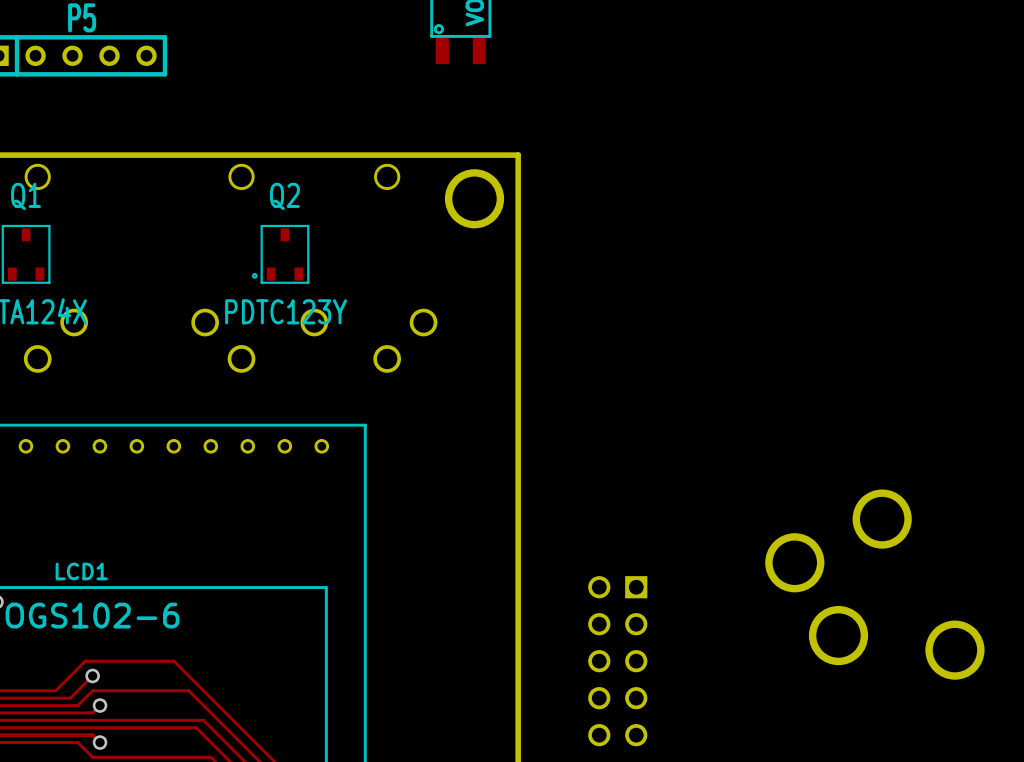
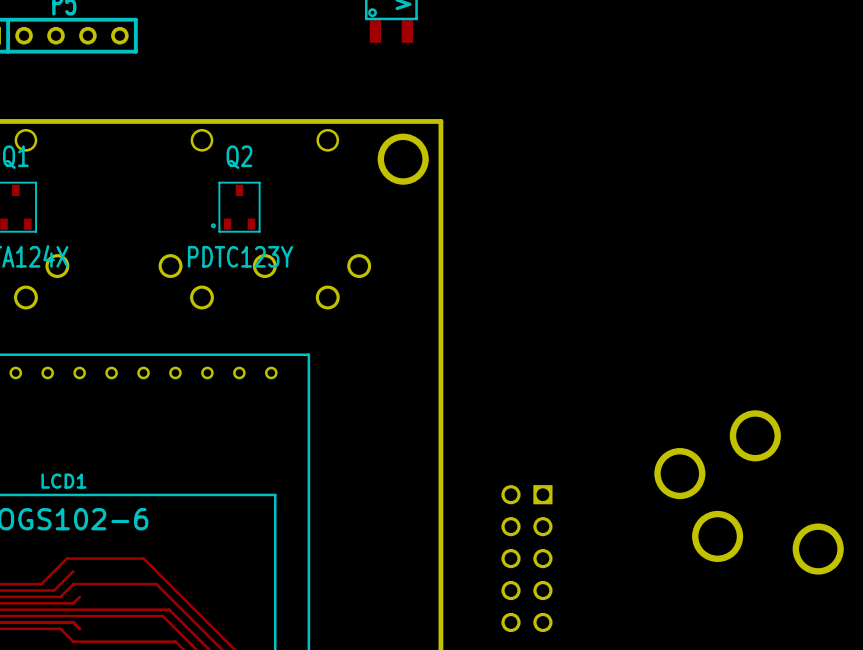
via: (92, 675) -> none
via: (100, 705) -> none
via: (100, 742) -> none

